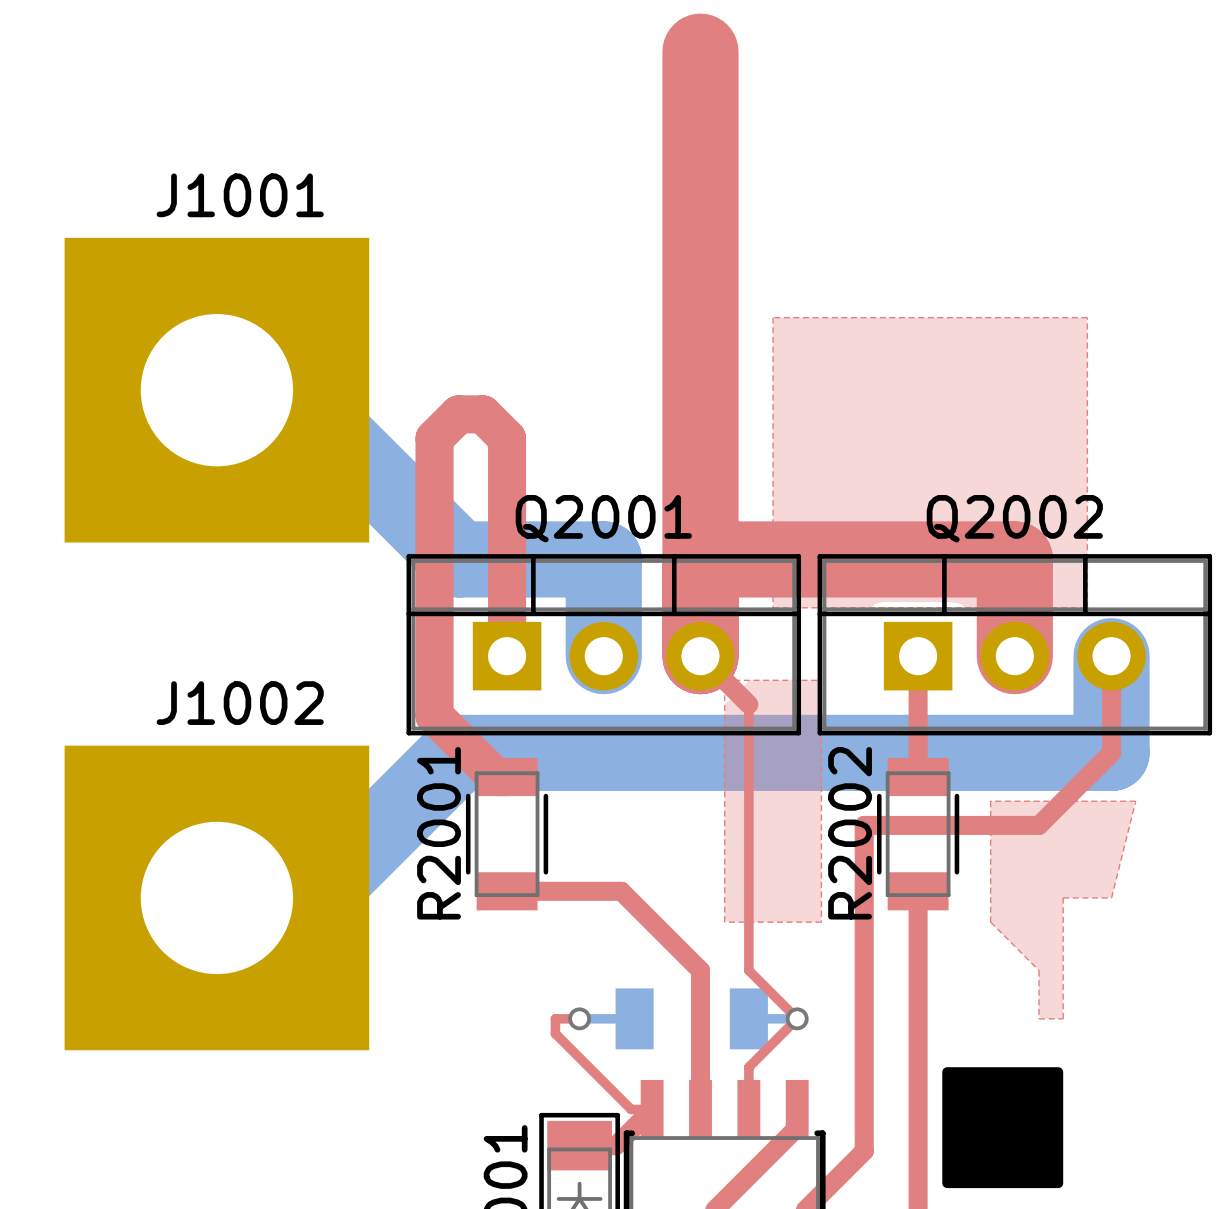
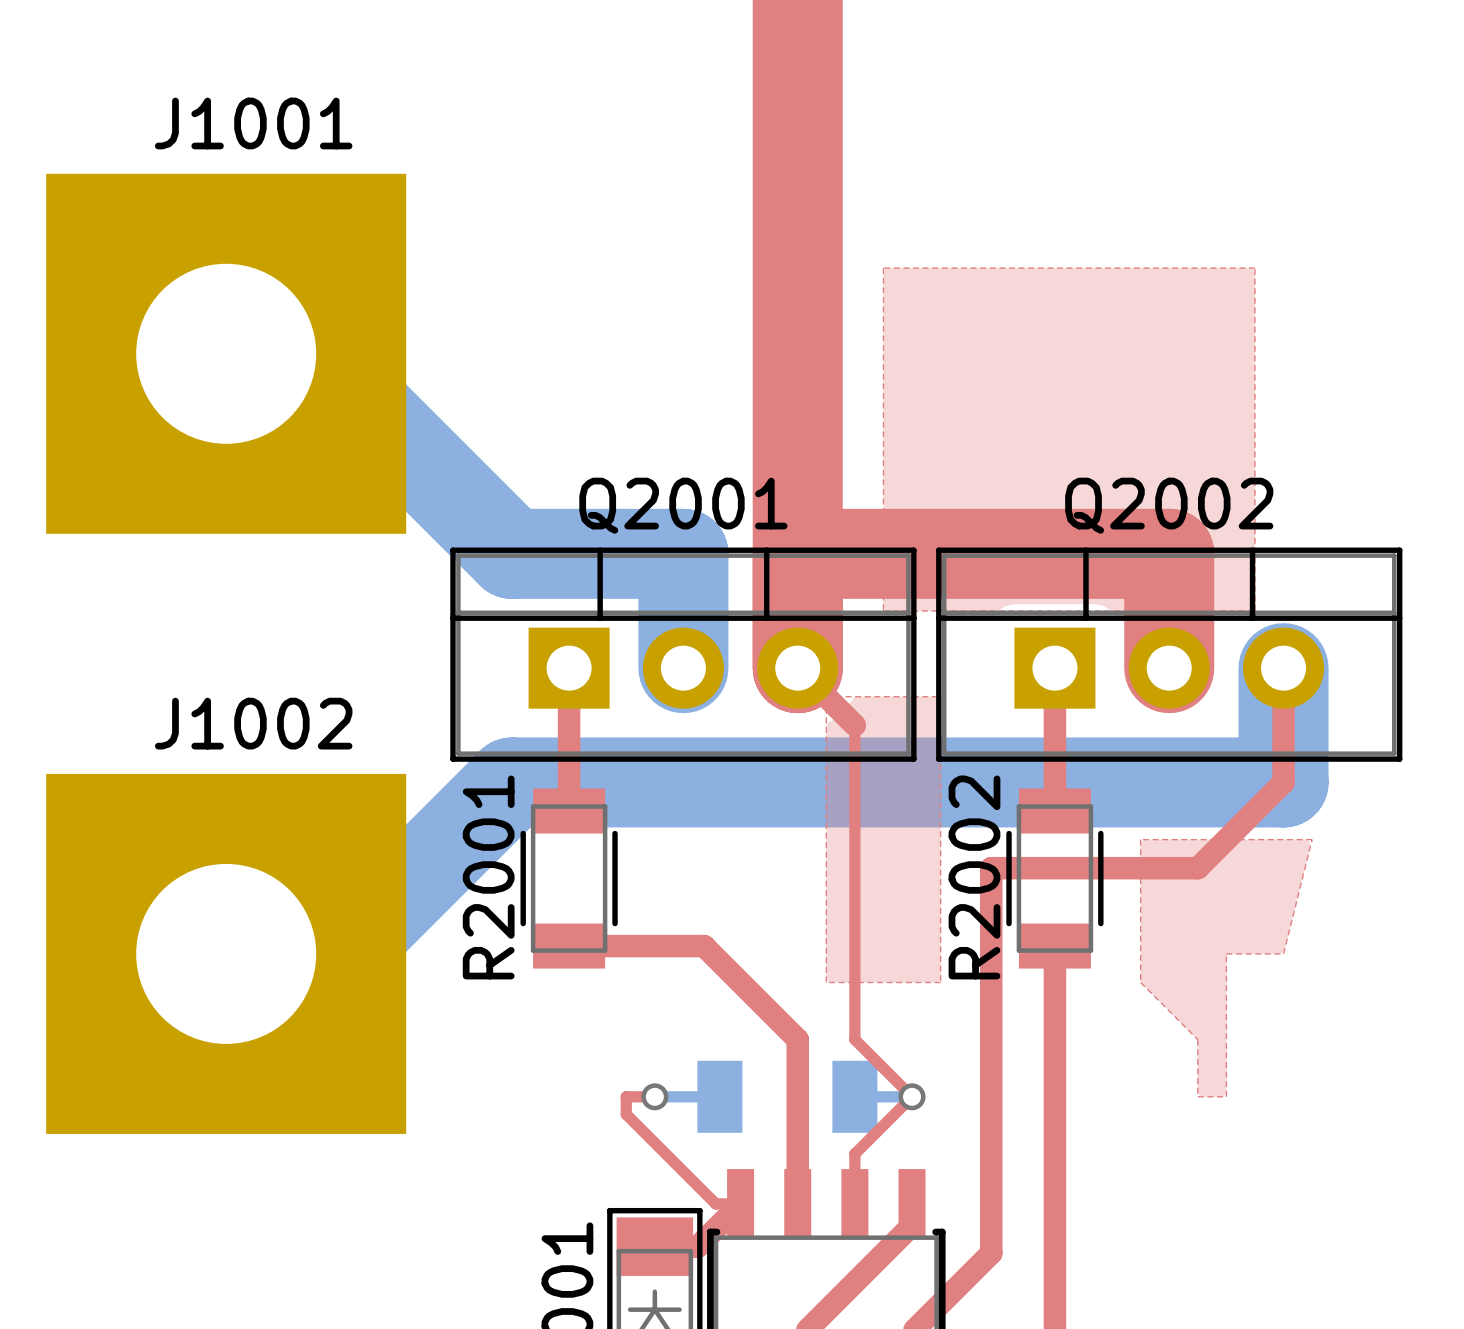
top track: (507, 656) (507, 438) (482, 414) (458, 414) (434, 438) (434, 715) (495, 777) (507, 777) -> (569, 668) (569, 811)
drawing: [942, 1067, 1064, 1189] -> none

